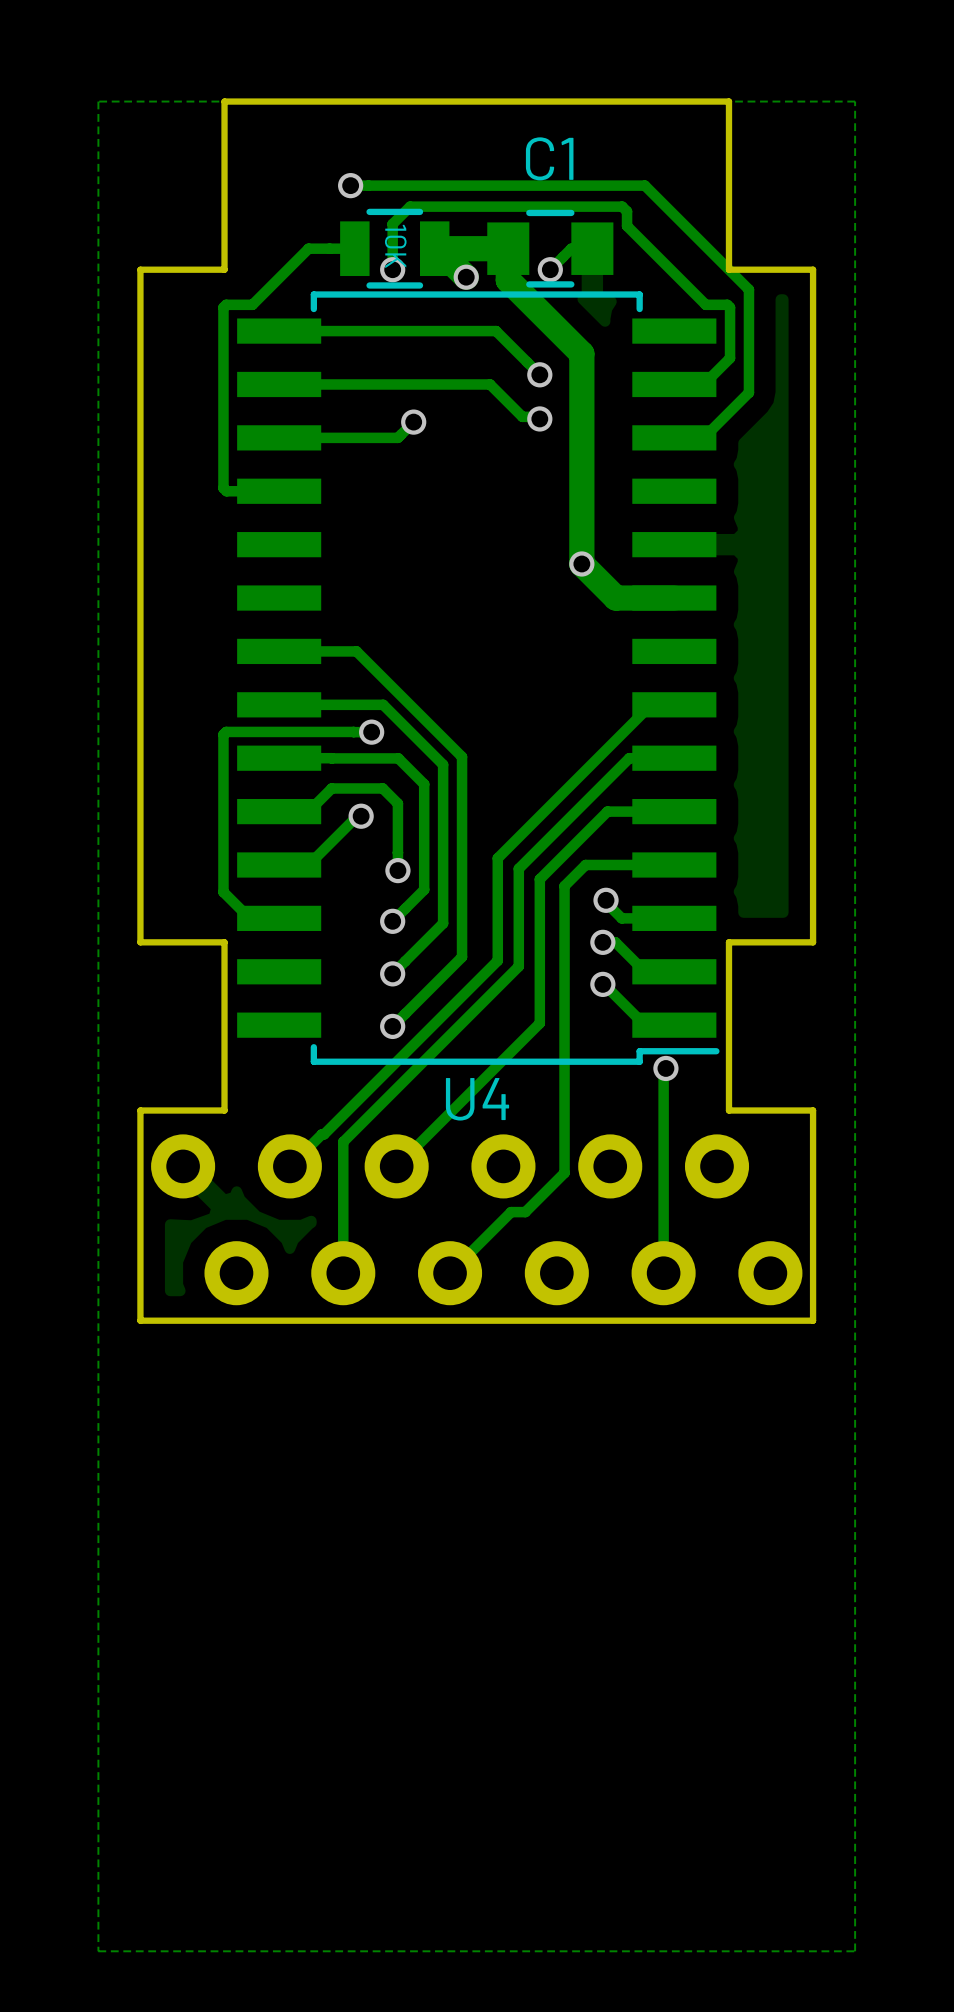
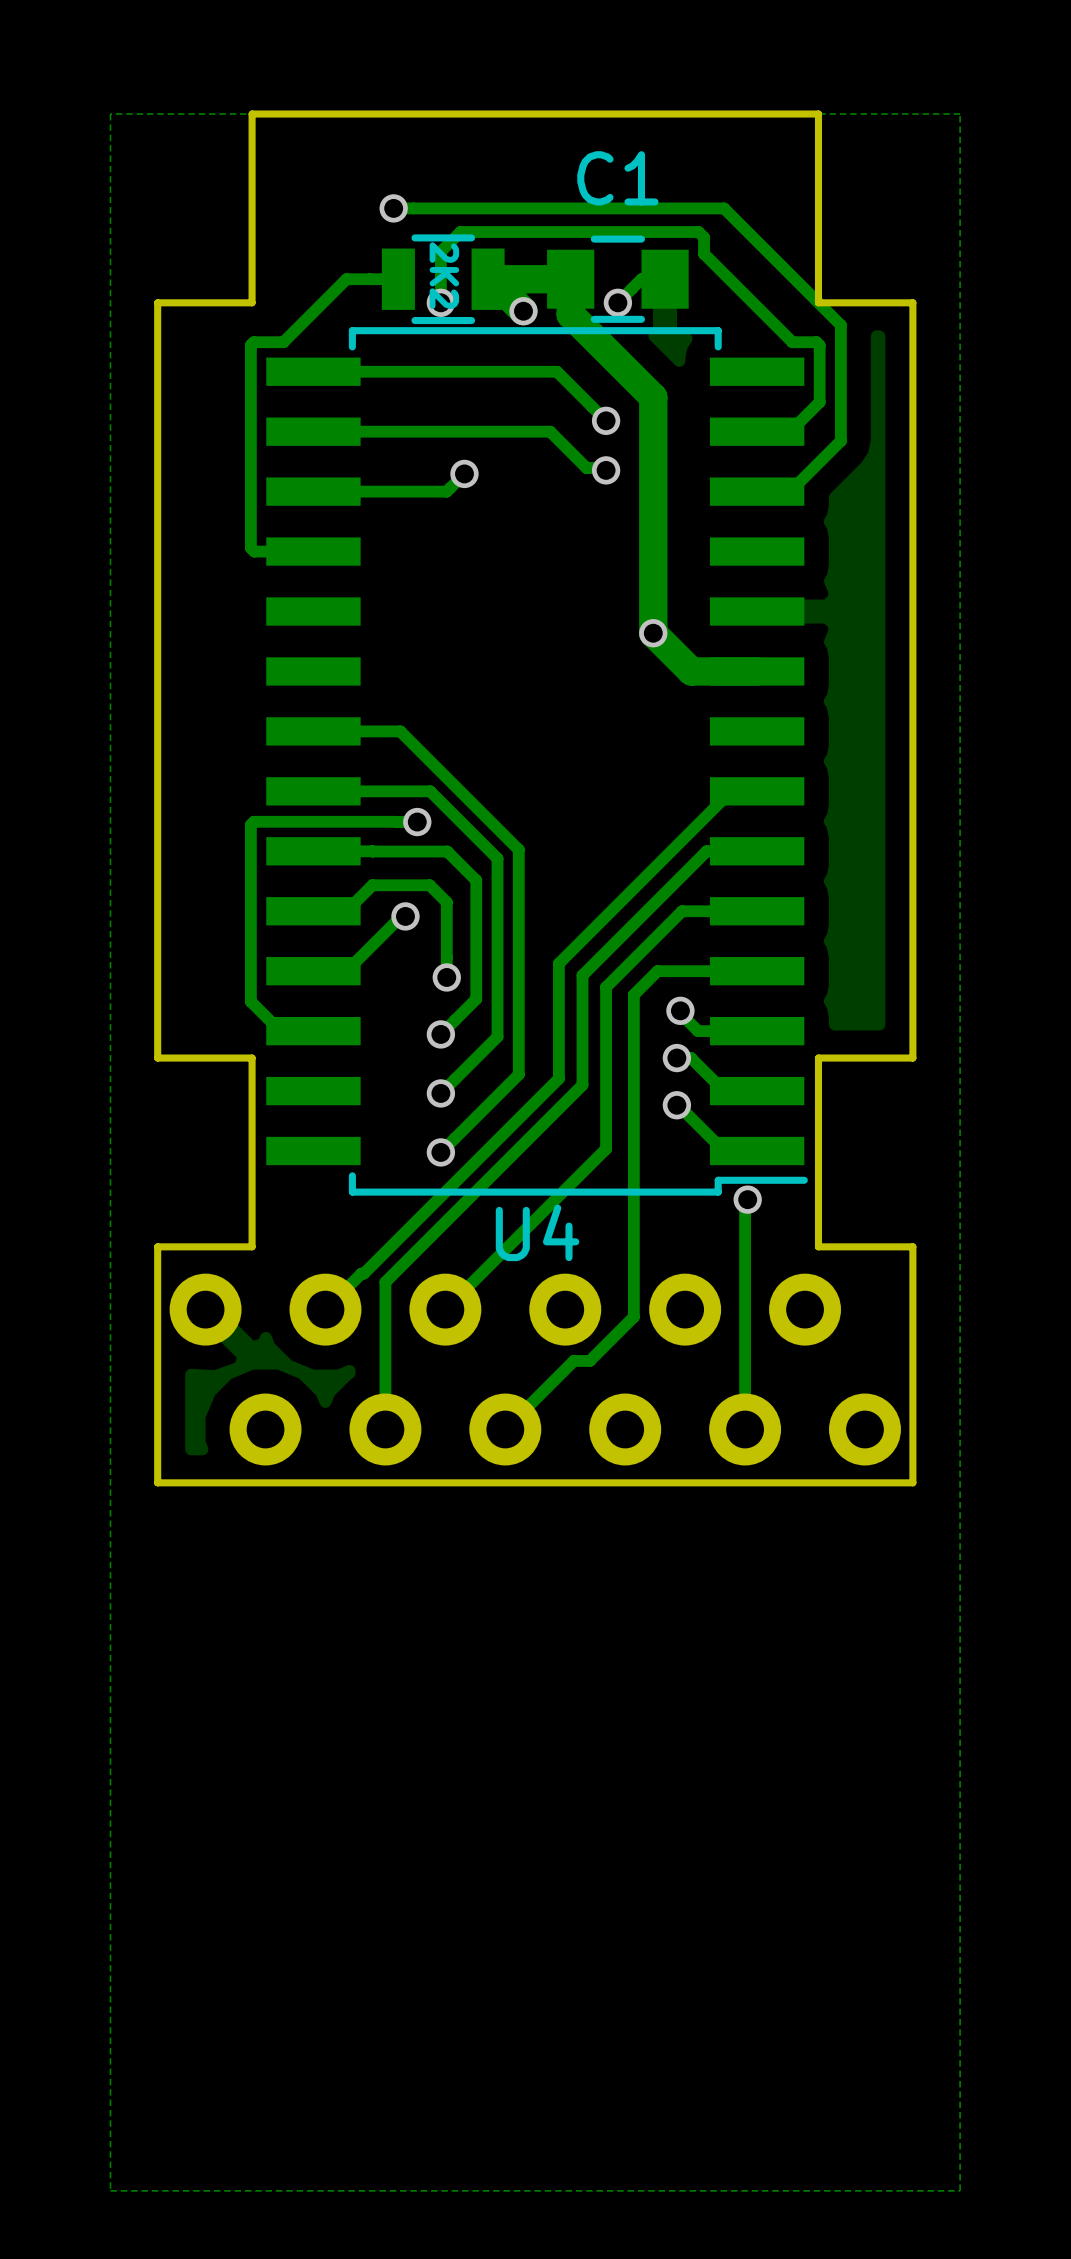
part value: 10K (395, 246) -> 2K2 (444, 275)

